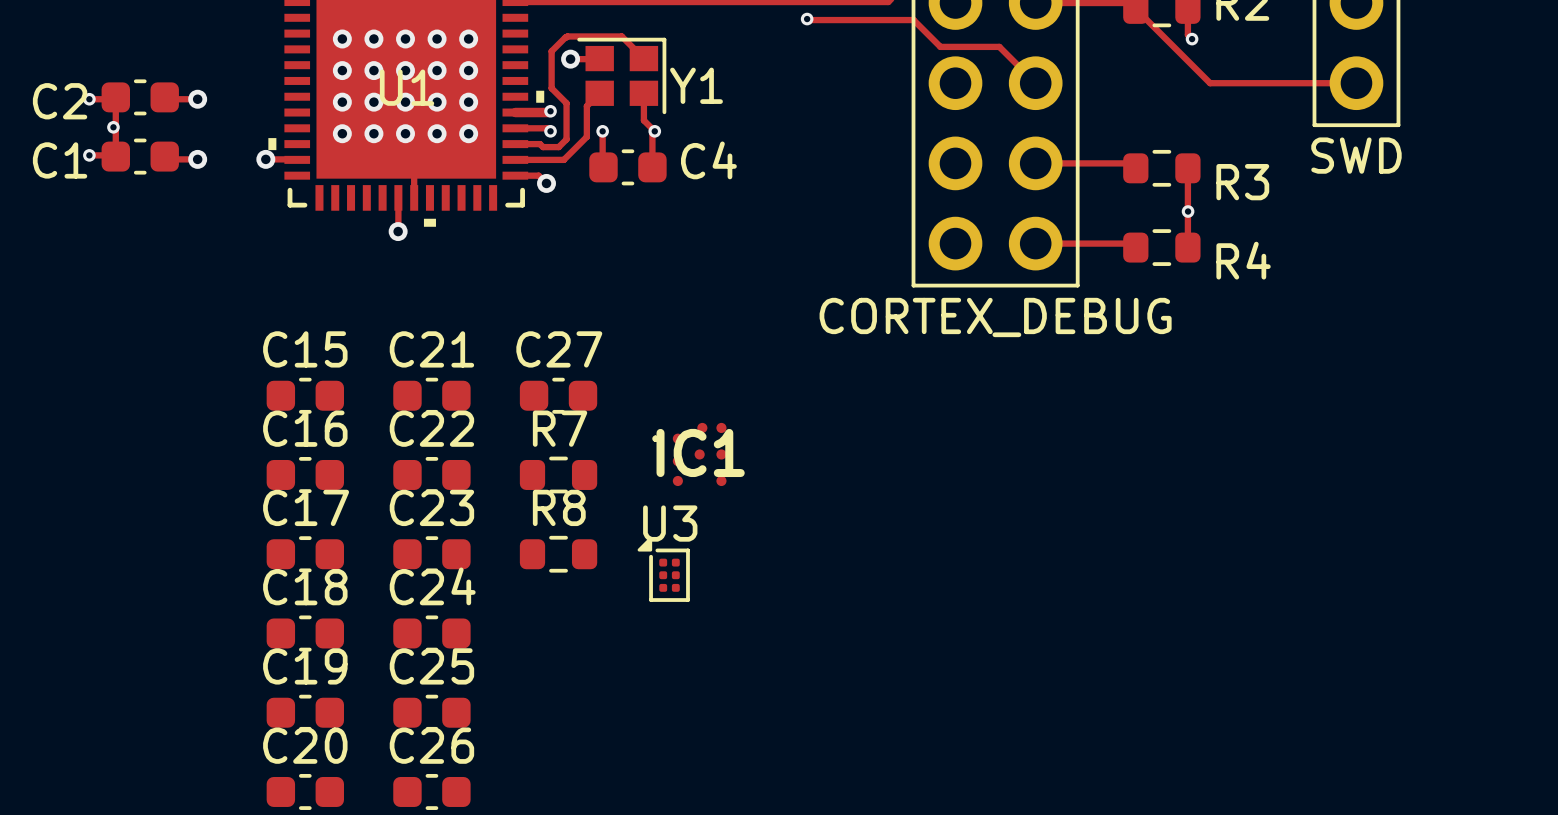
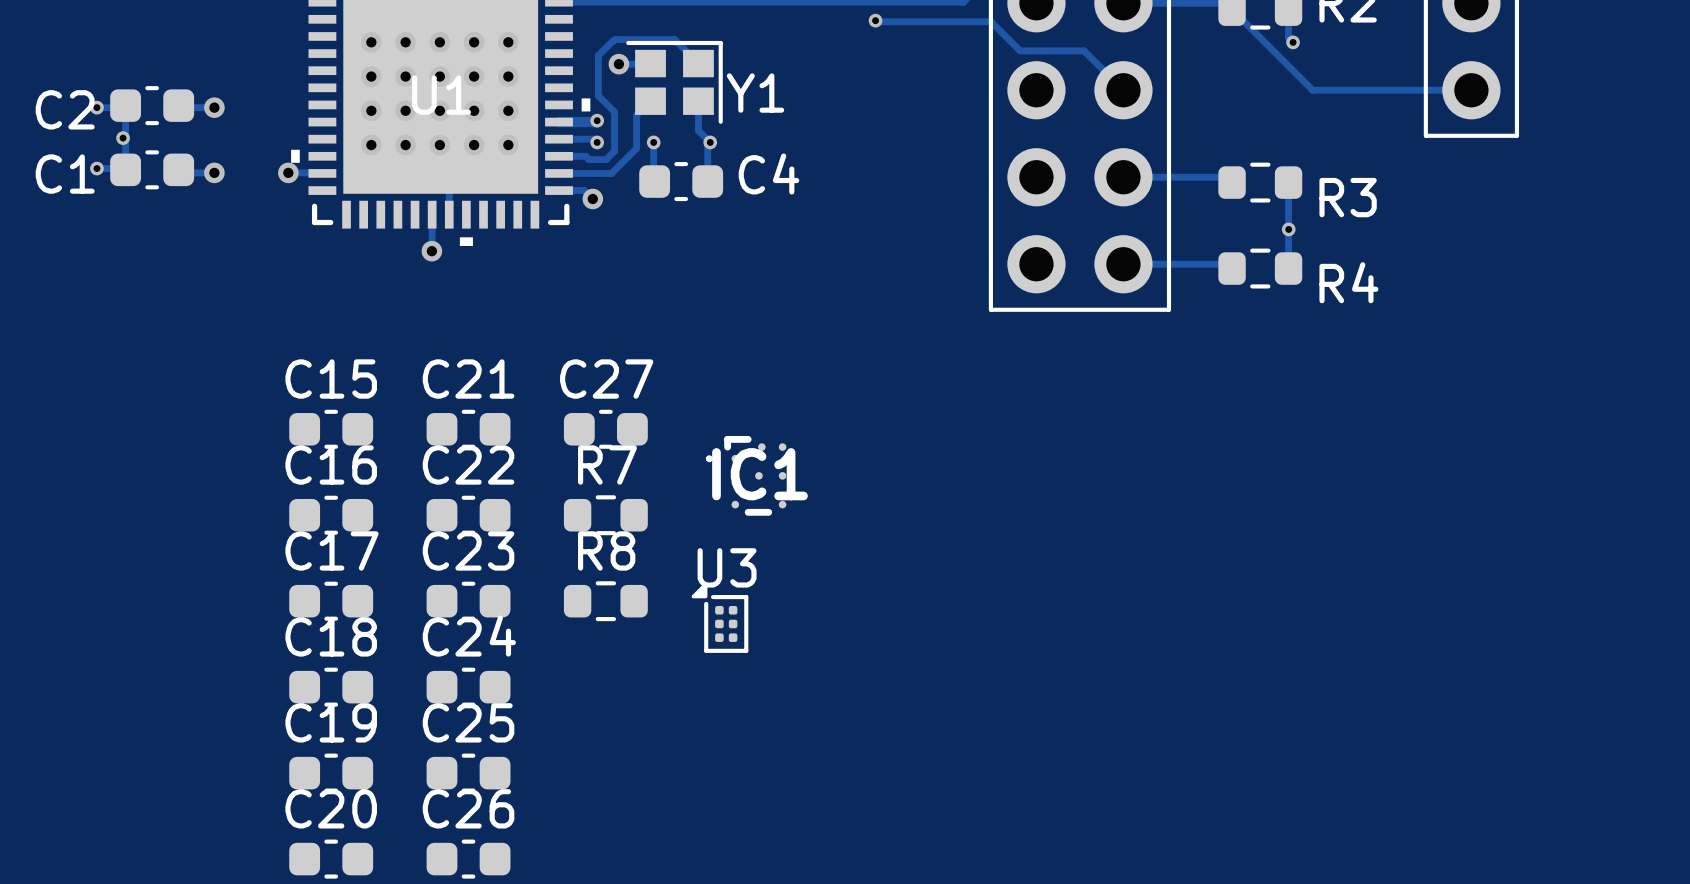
part value: SWD (1356, 155) -> none
part value: CORTEX_DEBUG (995, 317) -> none
IC1 footprint: [652, 422, 727, 487] -> [705, 435, 787, 516]

